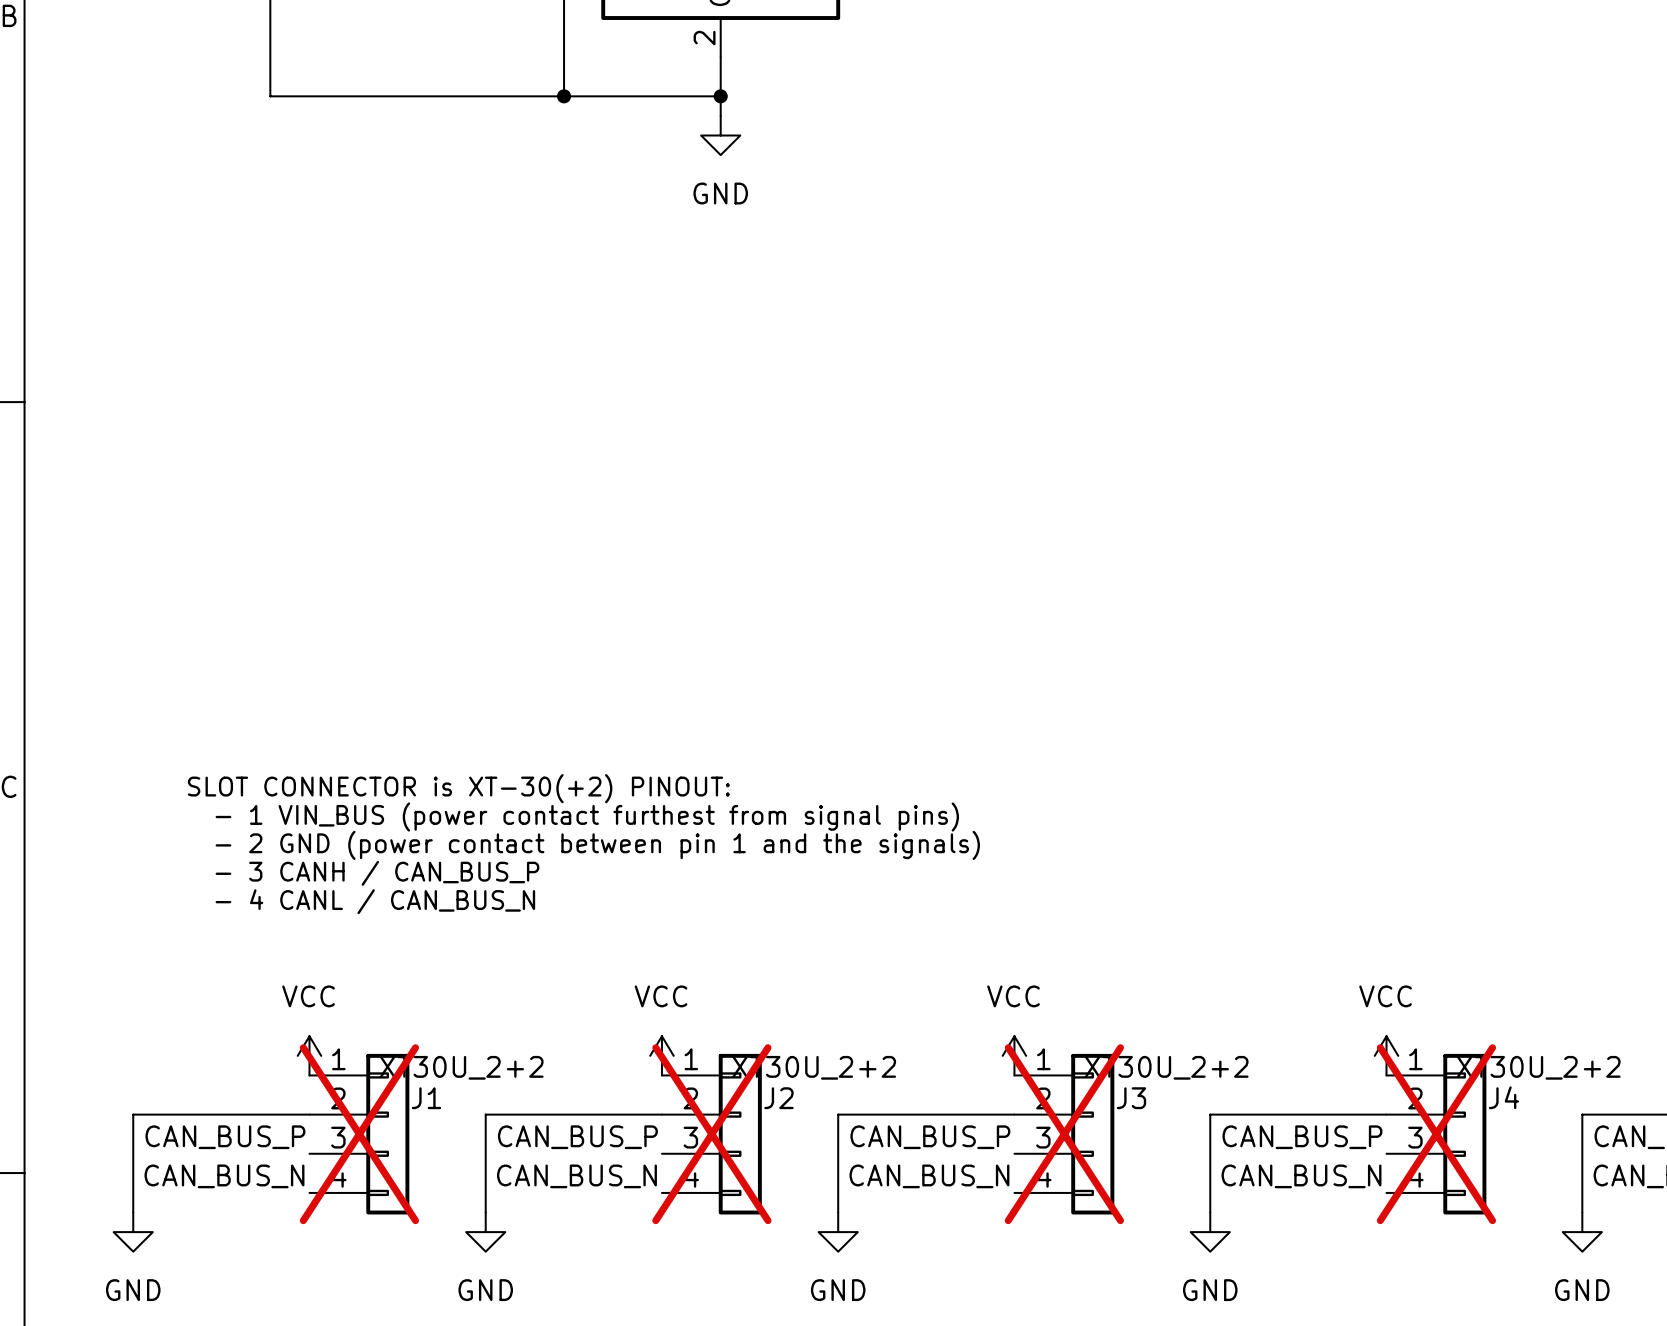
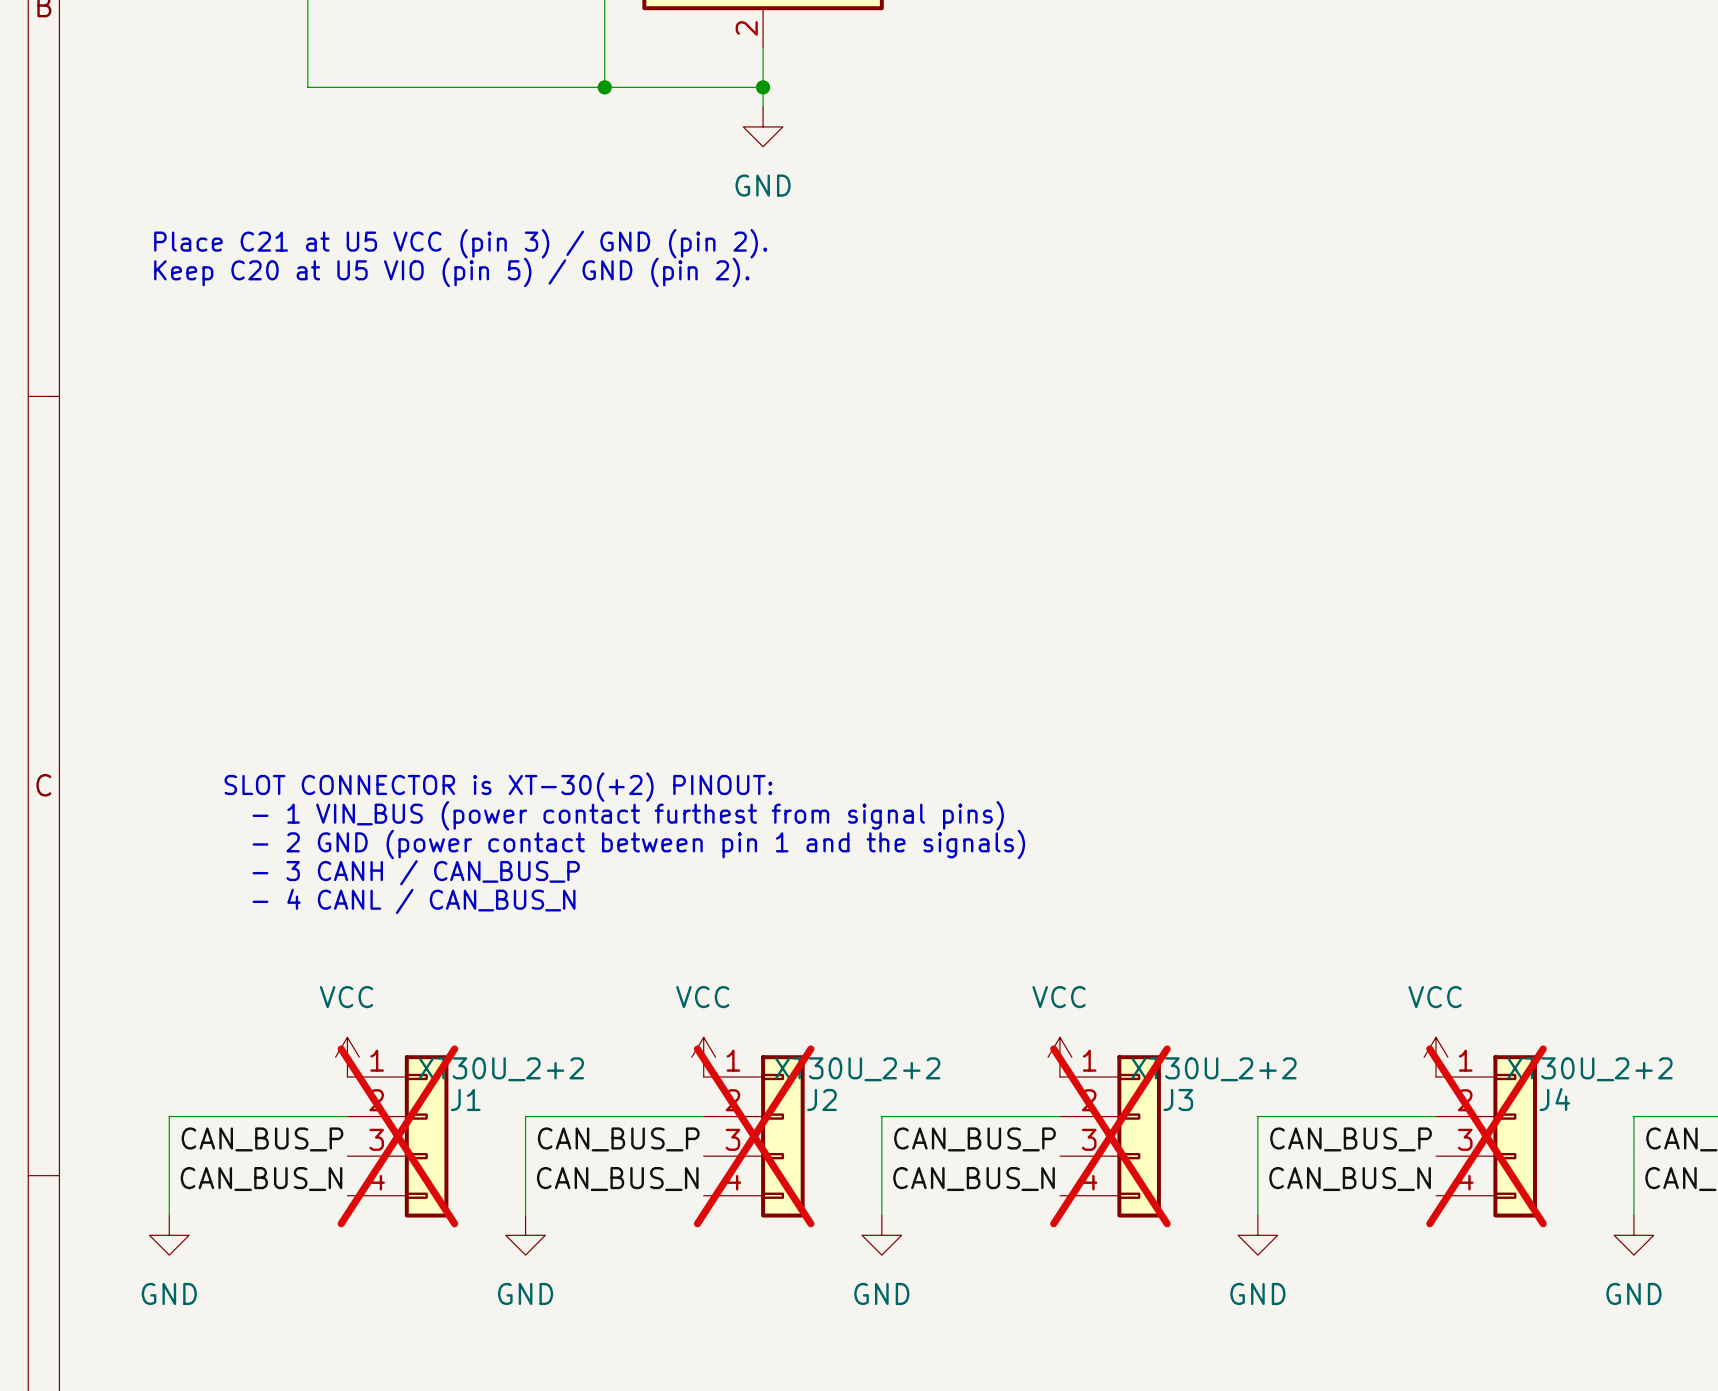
text: none -> Place C21 at U5 VCC (pin 3) / GND (pin 2). (460, 243)
text: none -> Keep C20 at U5 VIO (pin 5) / GND (pin 2). (451, 272)

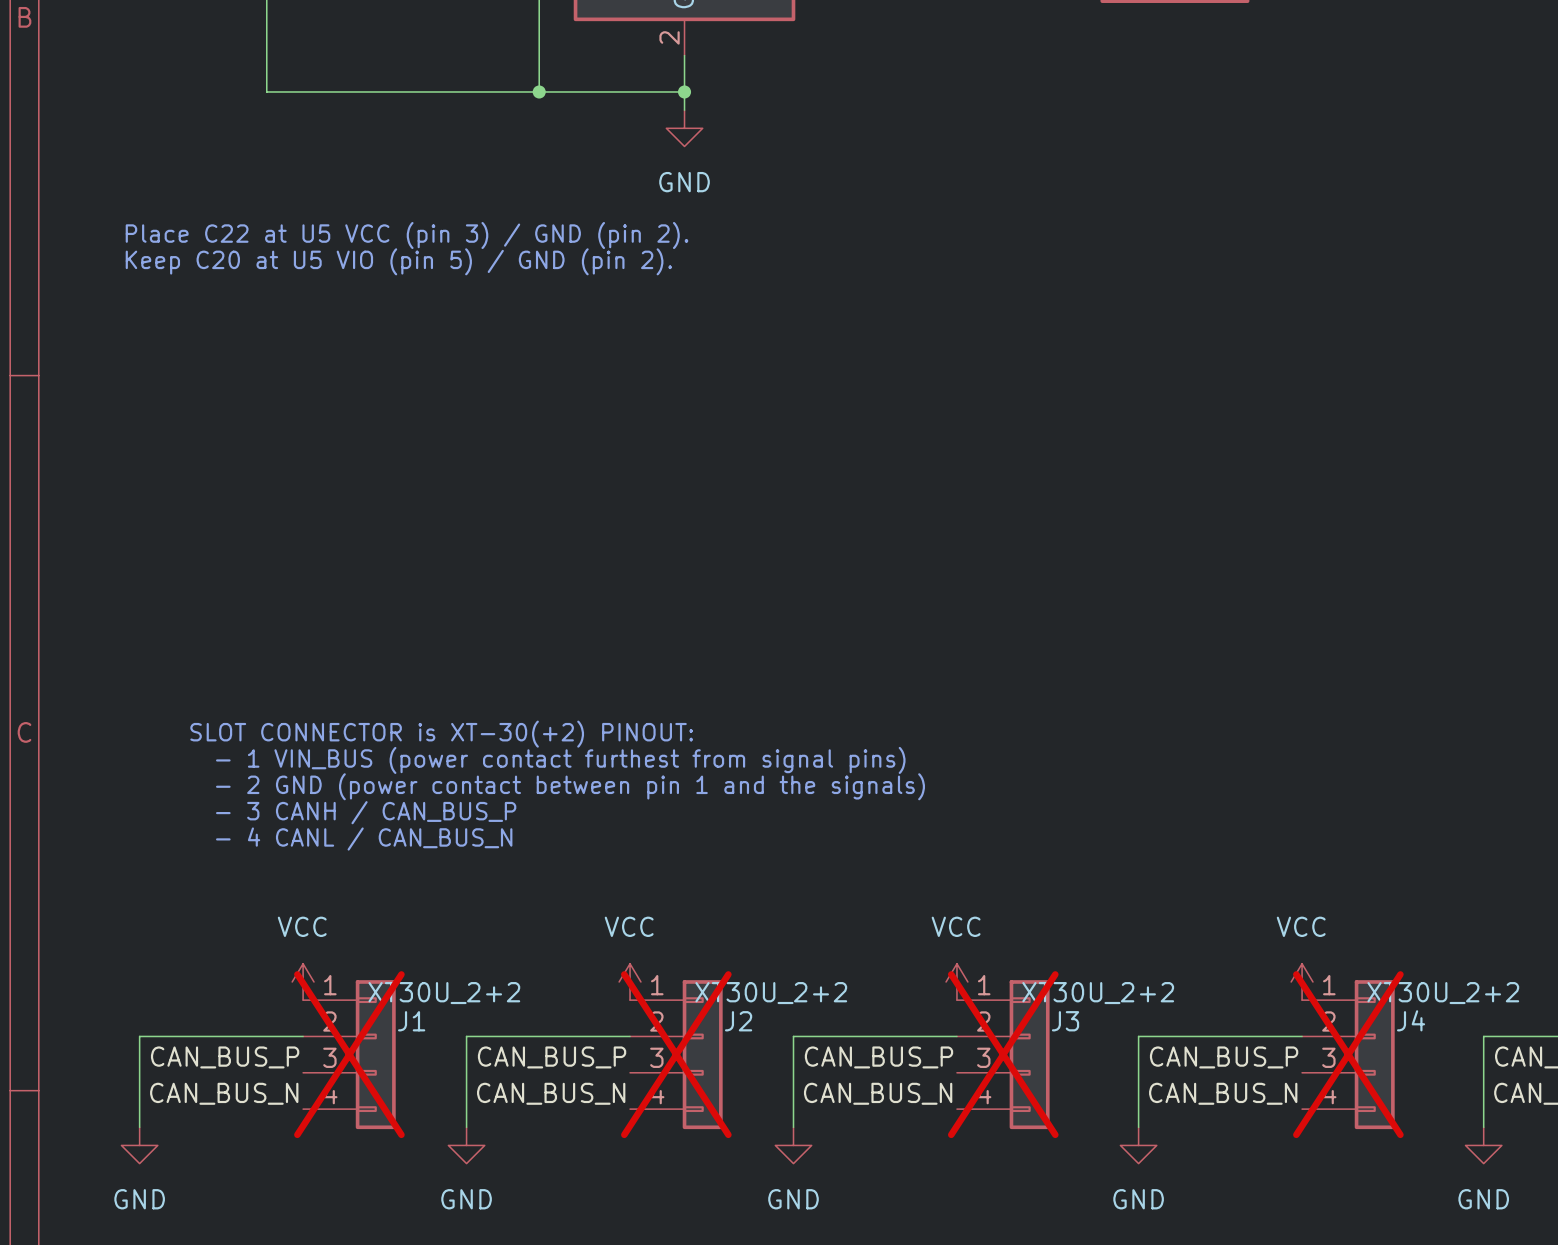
text: Place C21 at U5 VCC (pin 3) / GND (pin 2). (460, 243) -> Place C22 at U5 VCC (pin 3) / GND (pin 2). (407, 235)

